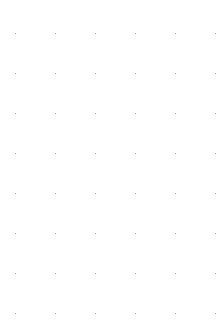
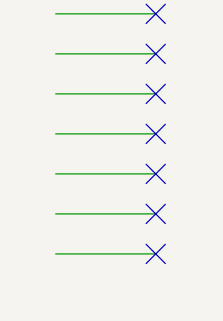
wire: none -> (55, 13) (155, 13)
no-connect mark: none -> (155, 13)
wire: none -> (55, 53) (155, 53)
no-connect mark: none -> (155, 53)
wire: none -> (55, 93) (155, 93)
no-connect mark: none -> (155, 93)
wire: none -> (55, 133) (155, 133)
no-connect mark: none -> (155, 133)
wire: none -> (55, 173) (155, 173)
no-connect mark: none -> (155, 173)
wire: none -> (55, 213) (155, 213)
no-connect mark: none -> (155, 213)
wire: none -> (55, 253) (155, 253)
no-connect mark: none -> (155, 253)

